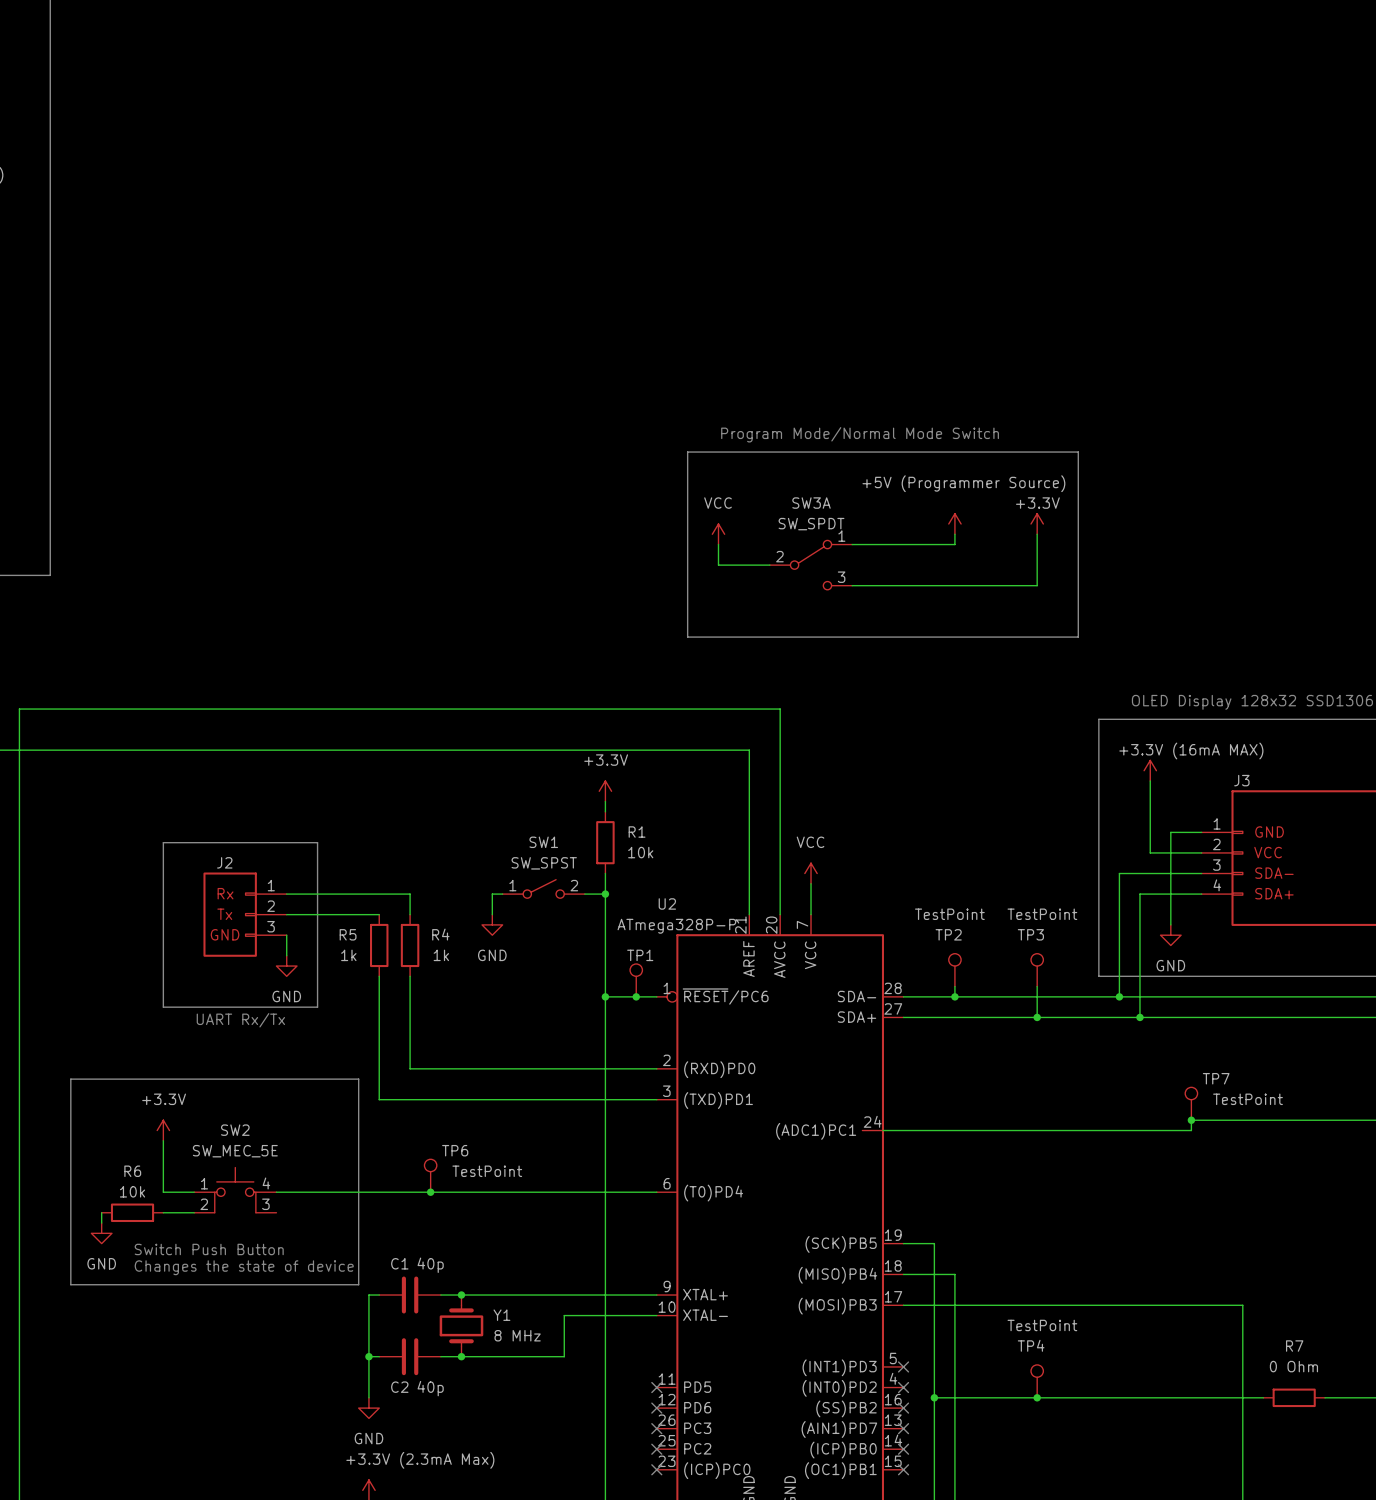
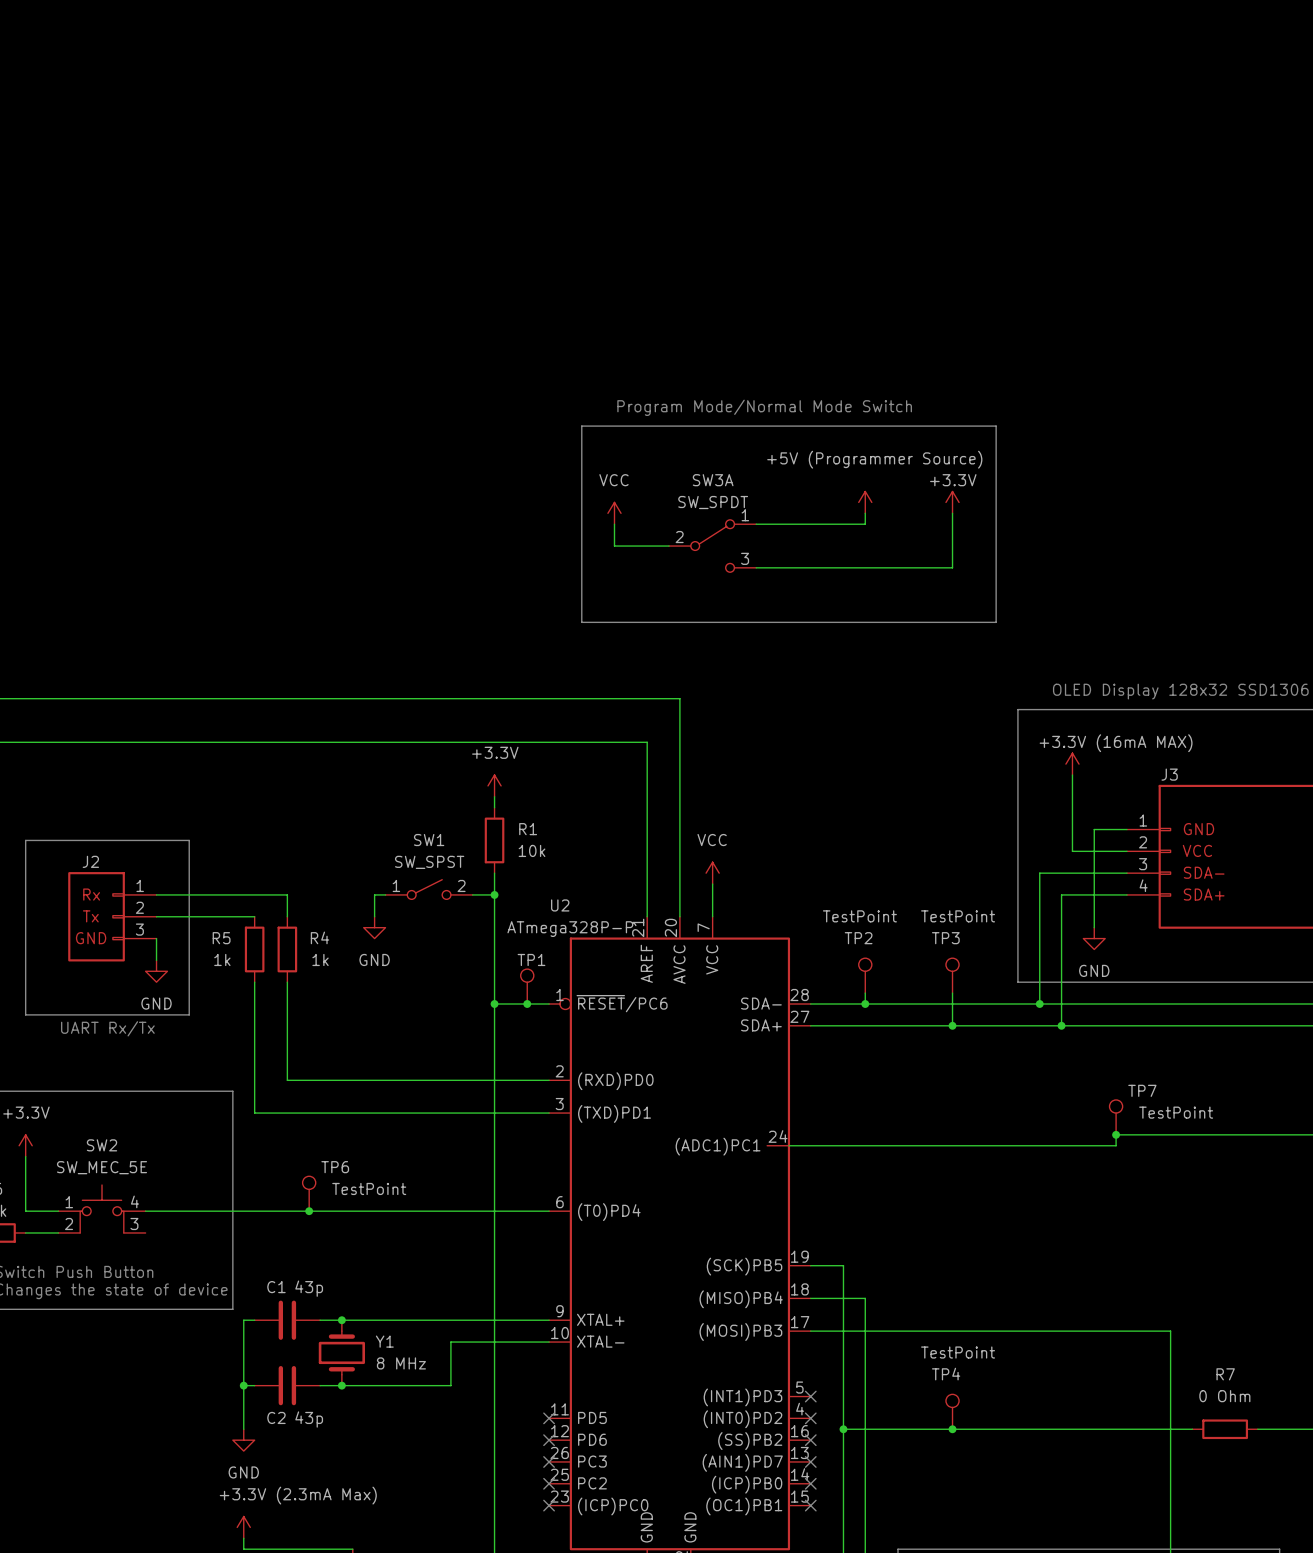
C1 value: 40p (430, 1265) -> 43p (309, 1288)
C2 value: 40p (430, 1388) -> 43p (309, 1419)

